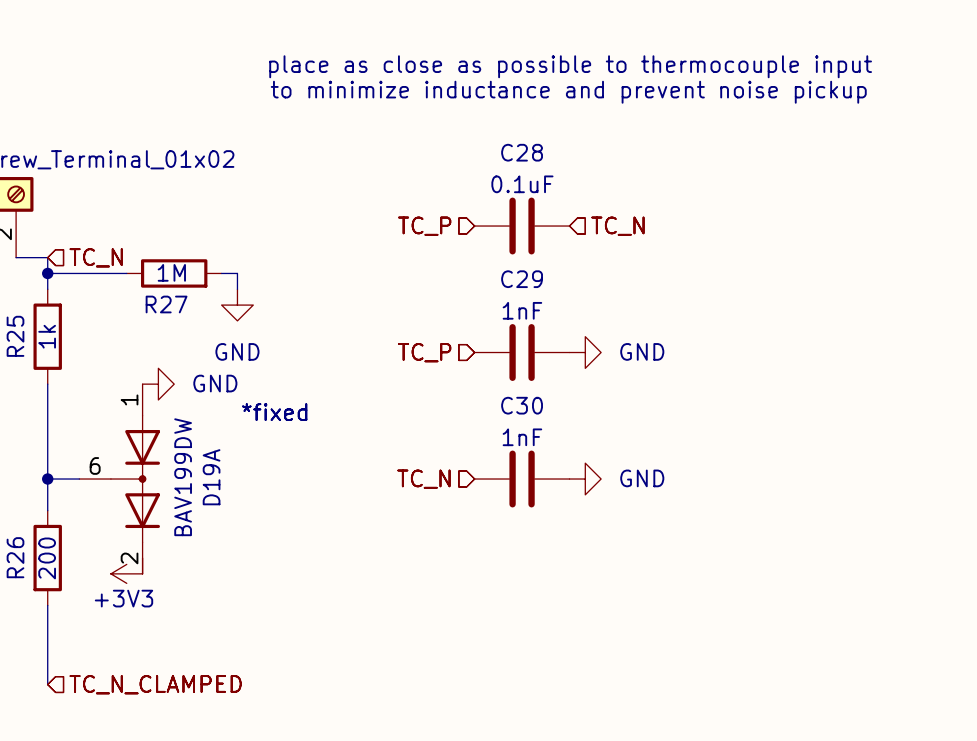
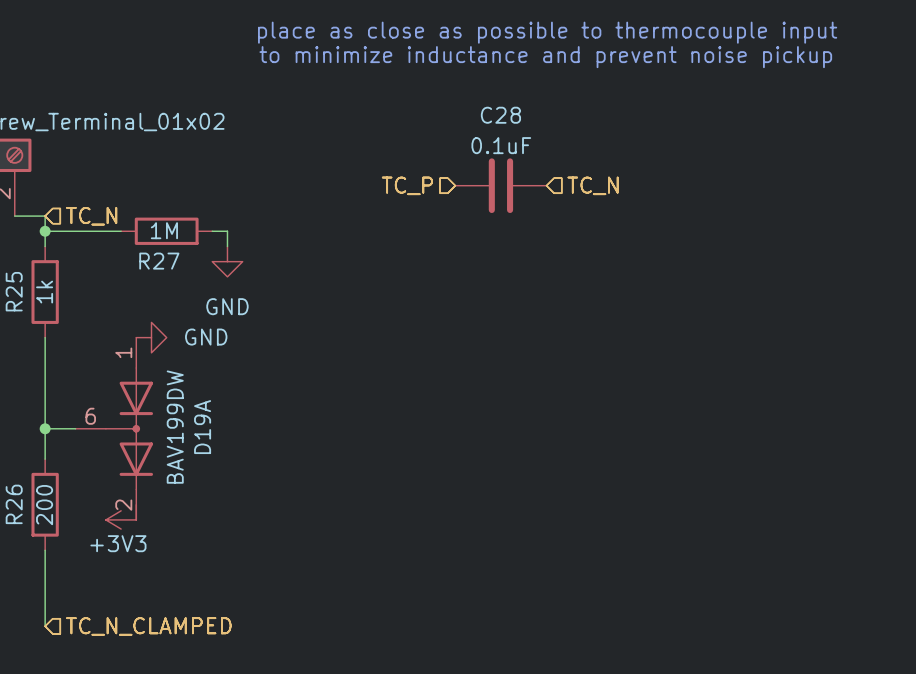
hierarchical label: TC_P (424, 352) -> none
C29: 1nF (522, 352) -> none
power symbol: GND (585, 352) -> none
text: *fixed (274, 412) -> none
hierarchical label: TC_N (423, 479) -> none
C30: 1nF (522, 479) -> none
power symbol: GND (585, 479) -> none

